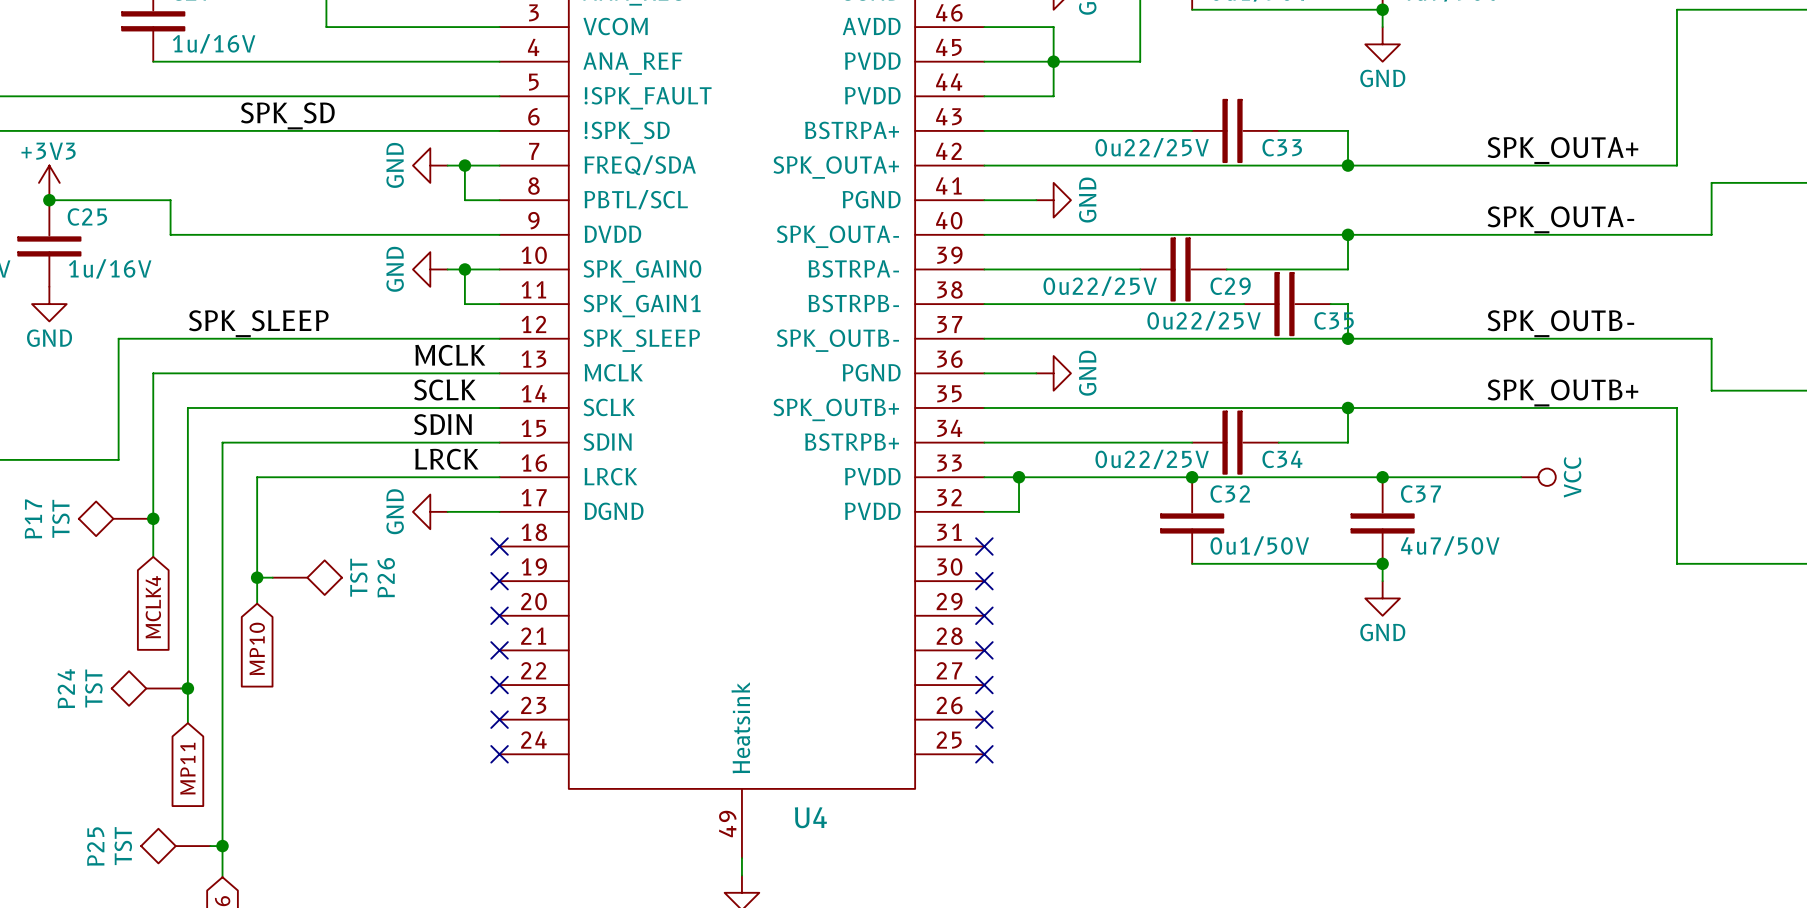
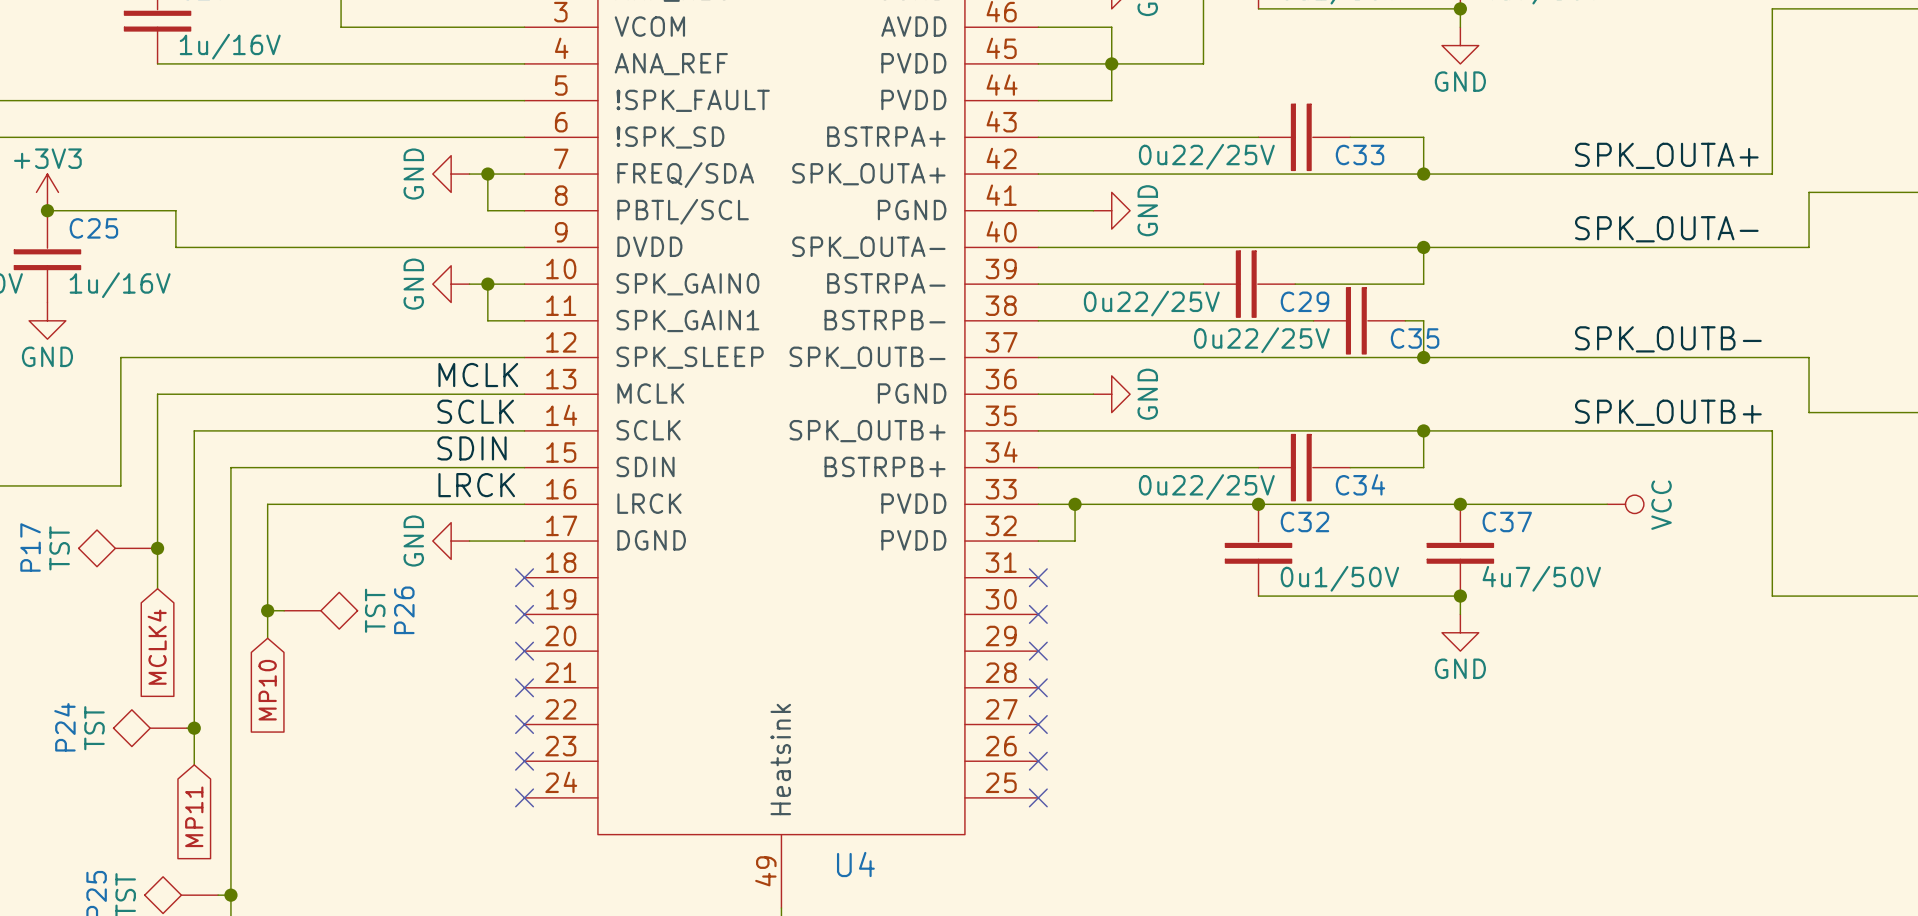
label: SPK_SD (287, 115) -> none
label: SPK_SLEEP (258, 323) -> none

